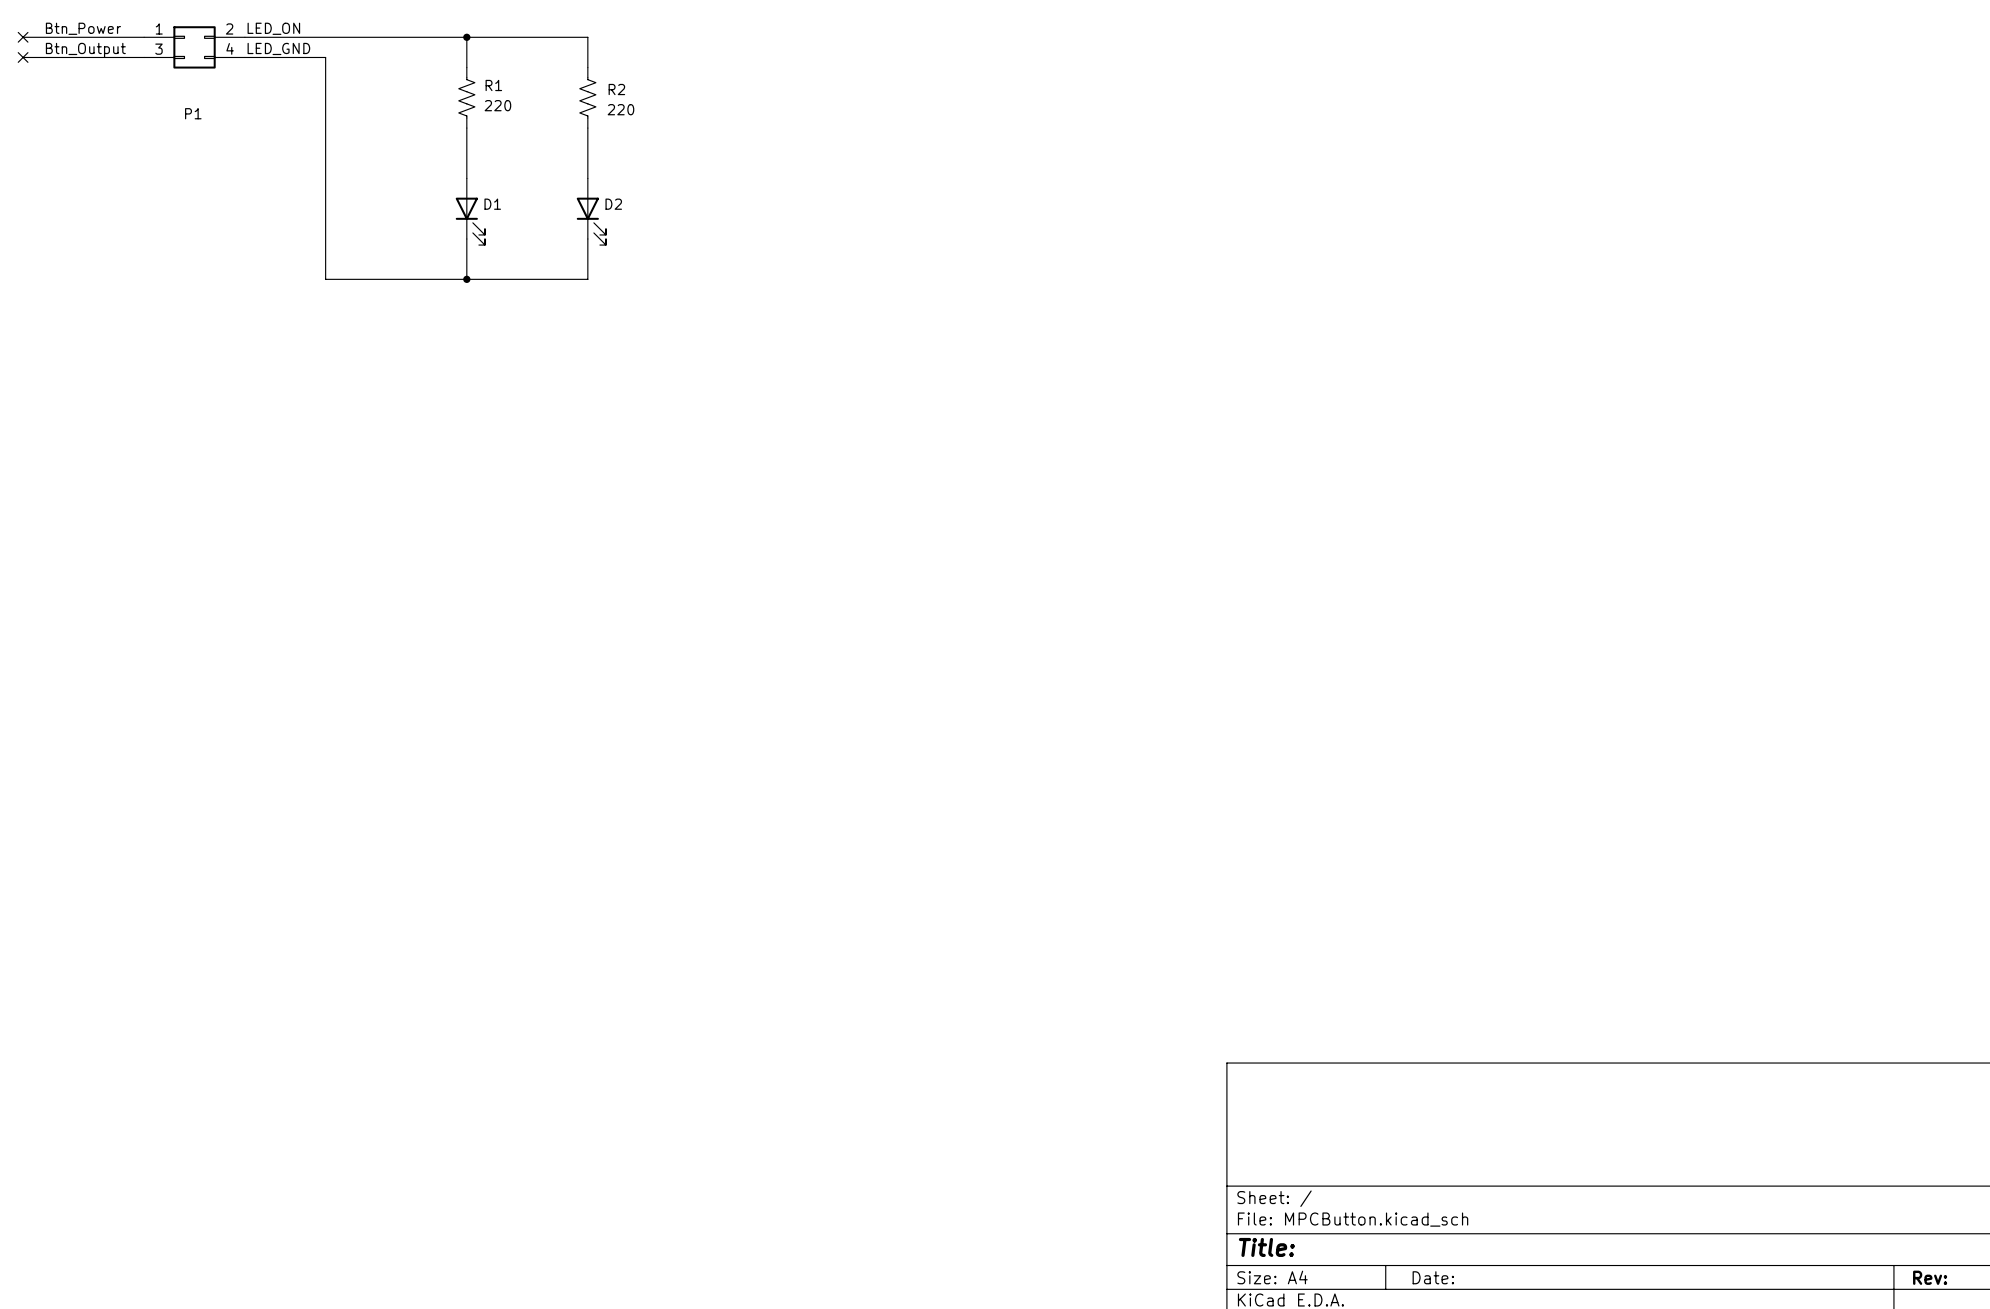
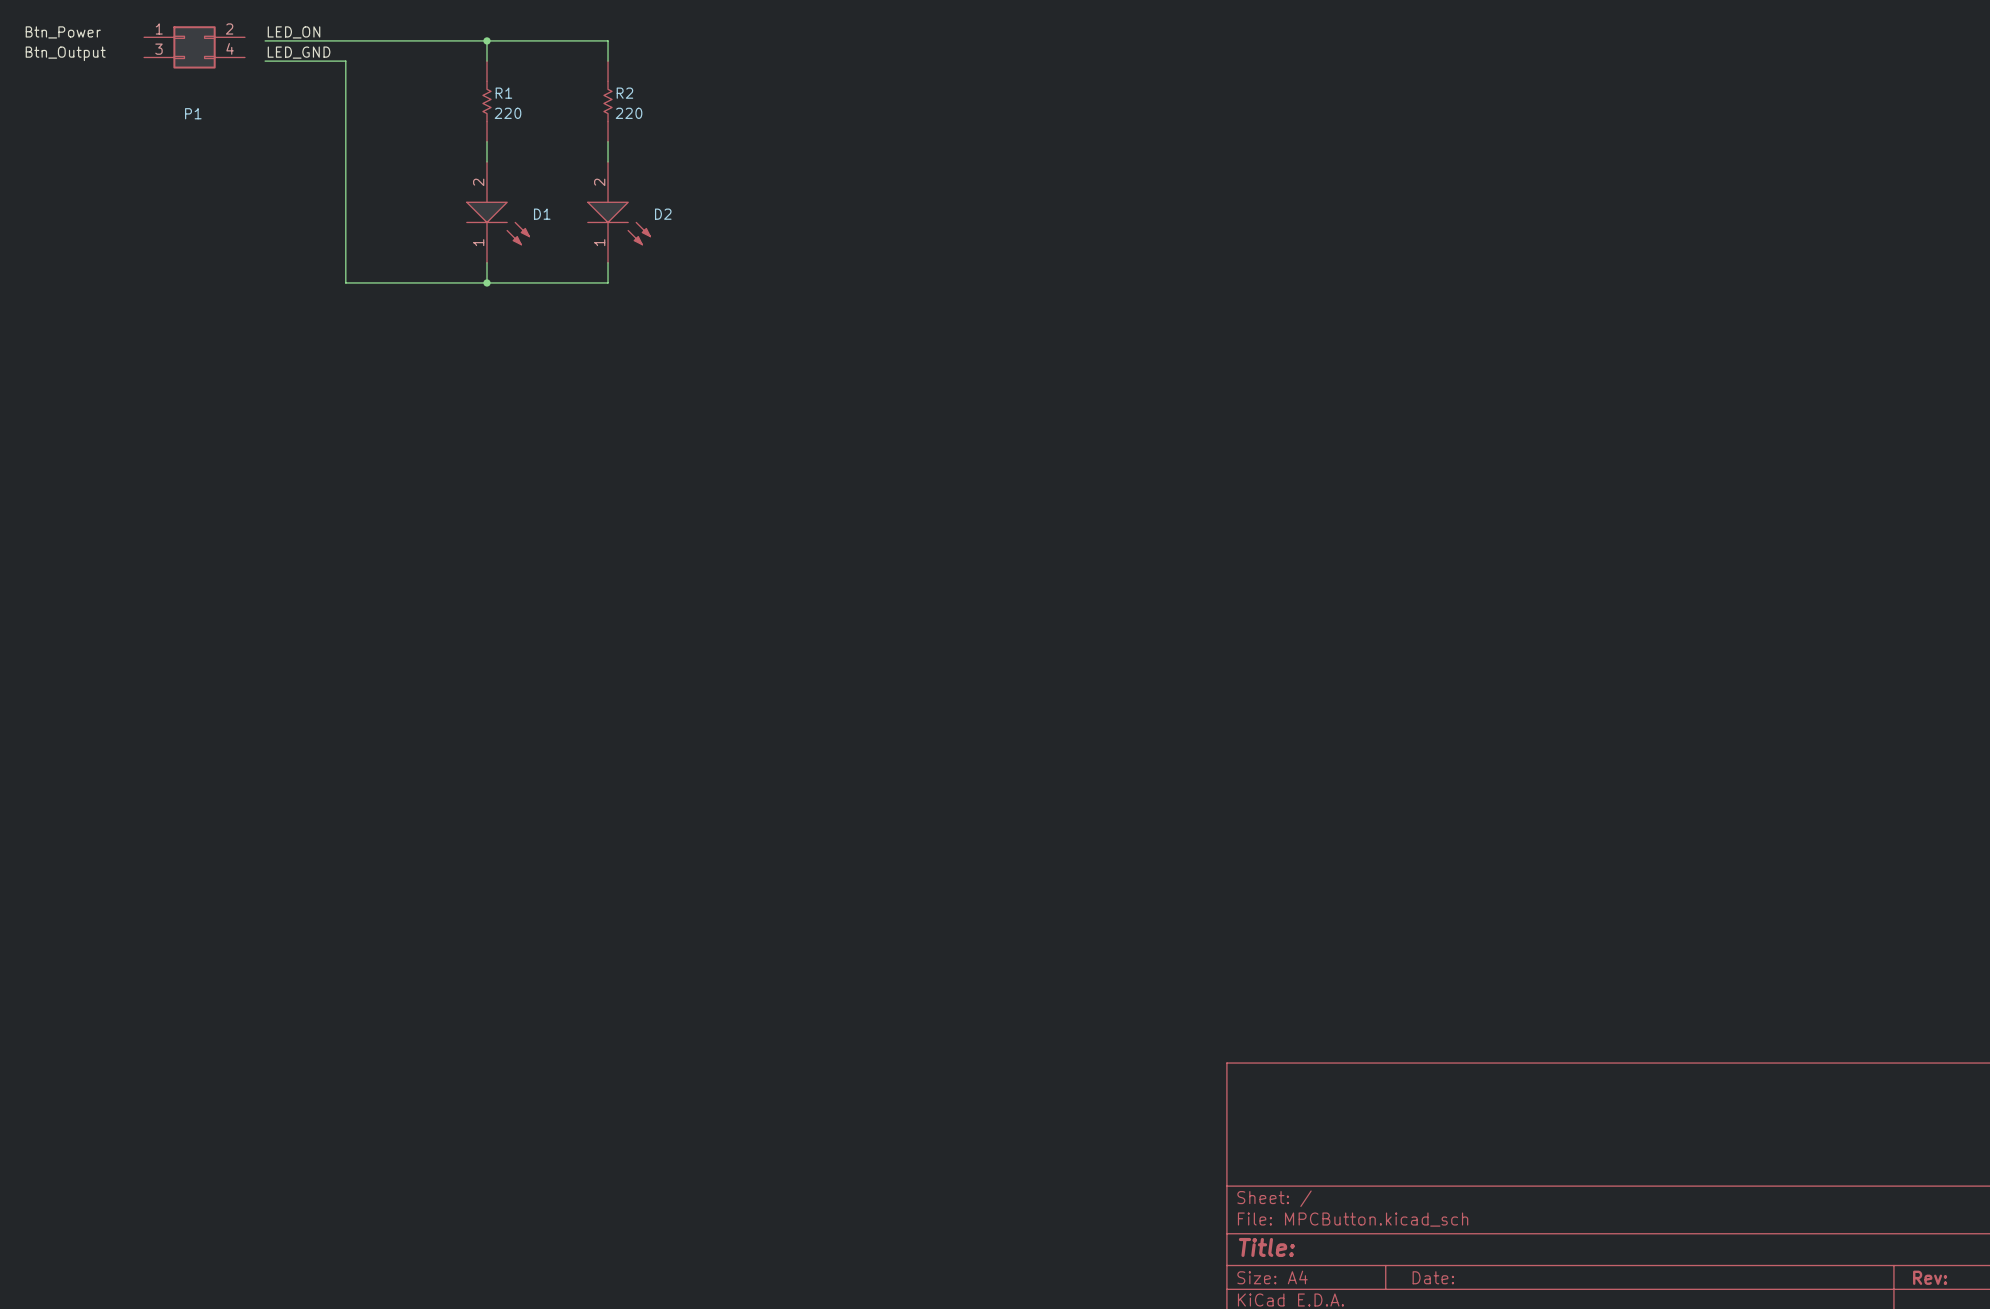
label position: Btn_Power (83, 28) -> Btn_Power (63, 32)
label position: LED_ON (273, 28) -> LED_ON (294, 32)
wire: (23, 37) (144, 37) -> none
no-connect mark: (23, 37) -> none
wire: (244, 37) (587, 37) (587, 67) -> none
wire: (466, 37) (466, 67) -> none
junction position: (466, 37) -> (486, 40)
wire: none -> (265, 40) (608, 40) (608, 61)
wire: none -> (486, 40) (486, 61)
label position: LED_GND (278, 48) -> LED_GND (299, 52)
label position: Btn_Output (85, 50) -> Btn_Output (65, 53)
wire: (23, 57) (144, 57) -> none
no-connect mark: (23, 57) -> none
wire: (244, 57) (325, 57) (325, 279) (587, 279) (587, 239) -> none
wire: none -> (265, 61) (345, 61) (345, 282) (608, 282) (608, 262)
R1 symbol: [458, 67, 475, 129] -> [482, 61, 492, 142]
R2 symbol: [579, 67, 596, 129] -> [603, 61, 613, 142]
wire: (466, 128) (466, 178) -> none
wire: (587, 128) (587, 178) -> none
wire: none -> (486, 141) (486, 161)
wire: none -> (608, 141) (608, 161)
D1 symbol: [455, 178, 485, 246] -> [466, 161, 530, 263]
D2 symbol: [576, 178, 606, 246] -> [587, 161, 651, 263]
D1 name position: D1 (492, 204) -> D1 (542, 214)
D2 name position: D2 (613, 204) -> D2 (663, 214)
wire: (466, 239) (466, 279) -> none
wire: none -> (486, 262) (486, 282)
junction position: (466, 279) -> (486, 282)

